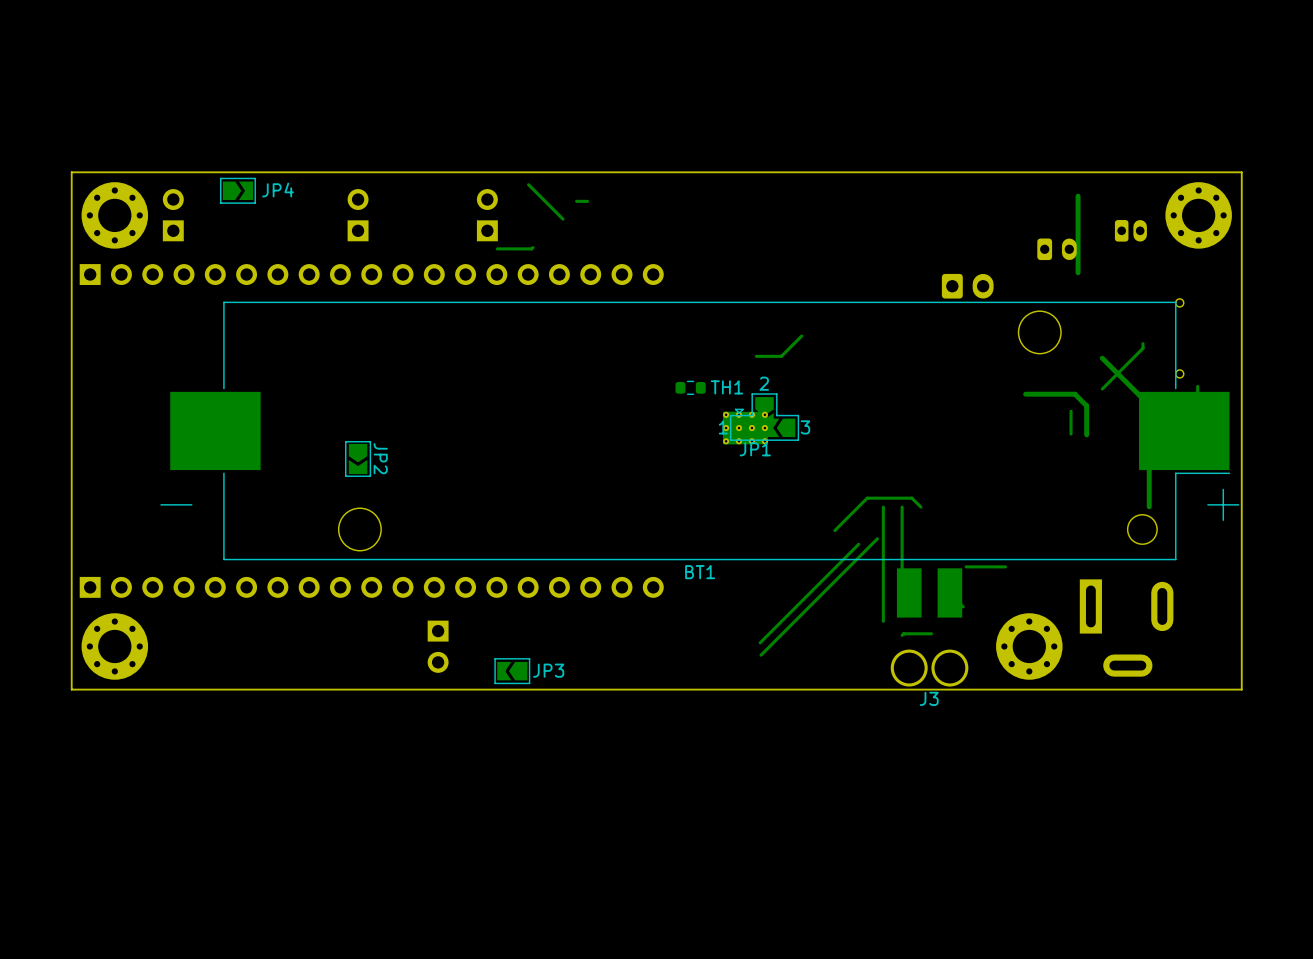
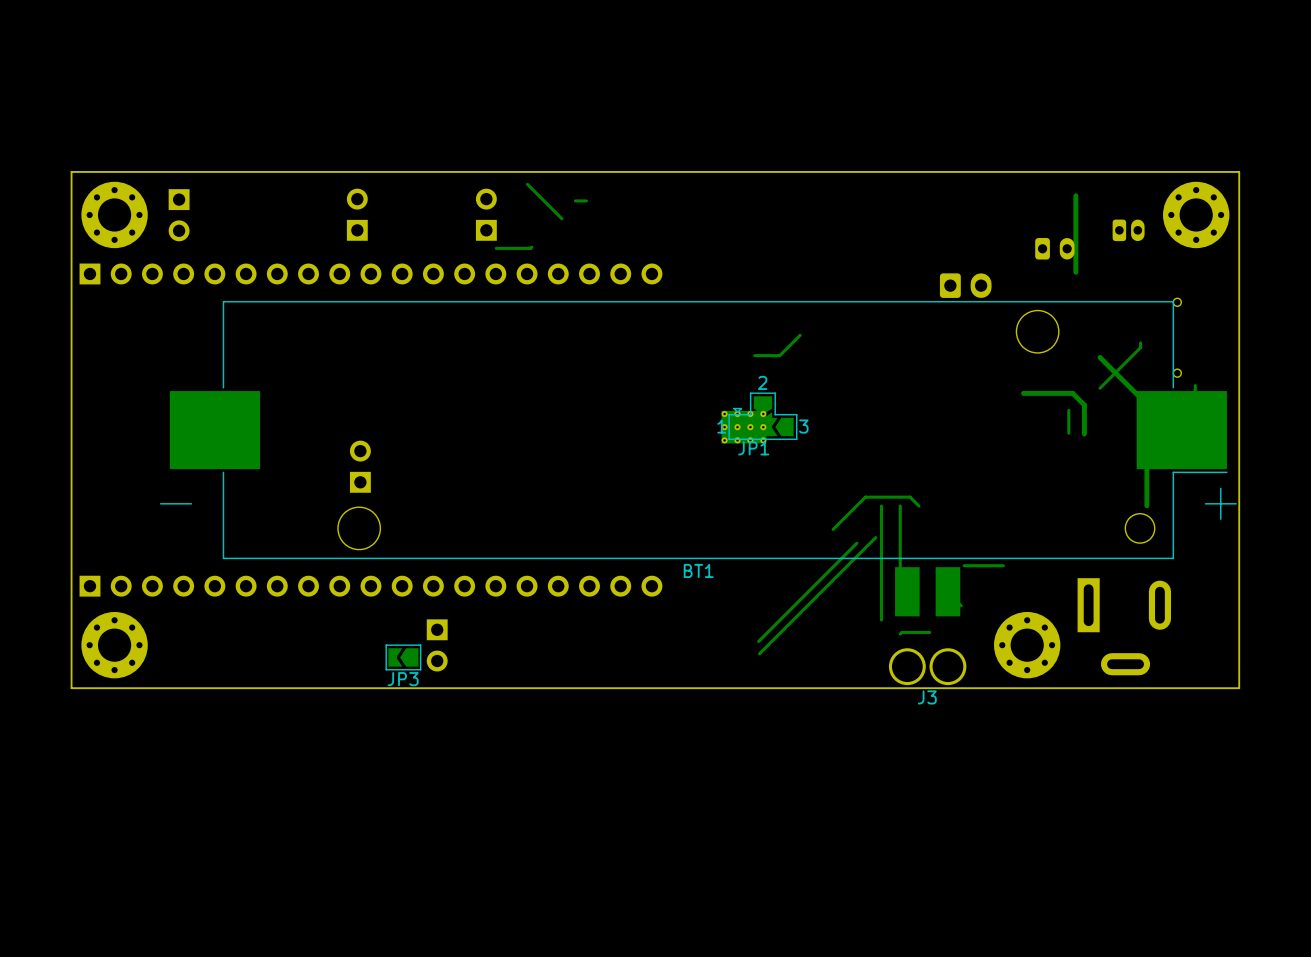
JP4: (237, 190) -> none
part rotation: 0° (173, 215) -> 180° (179, 215)
TH1: (690, 387) -> none
JP2: (358, 458) -> none
part: none -> (360, 466)
JP3 name position: JP3 (548, 670) -> JP3 (403, 679)
JP3 position: (512, 671) -> (403, 657)

